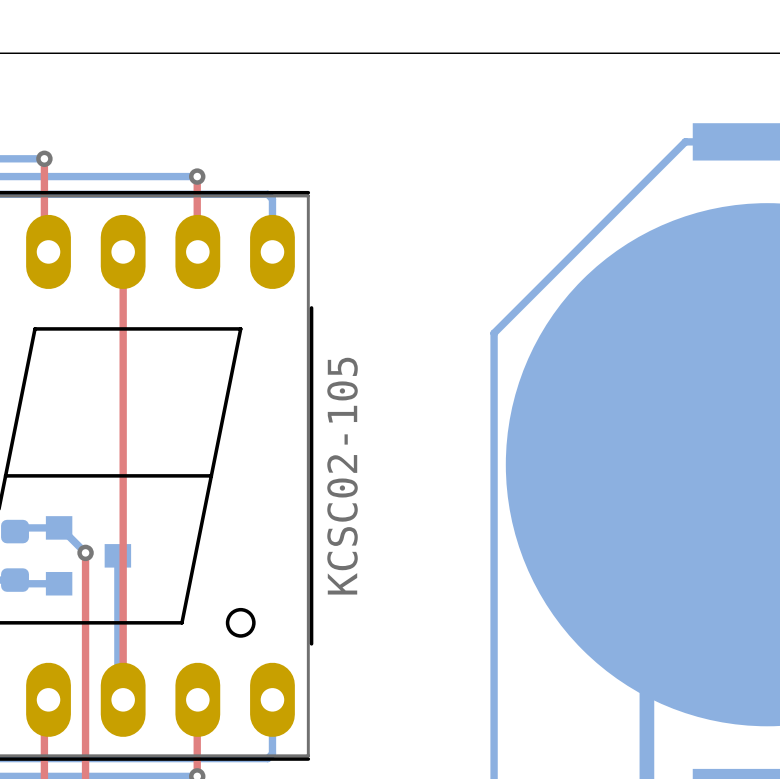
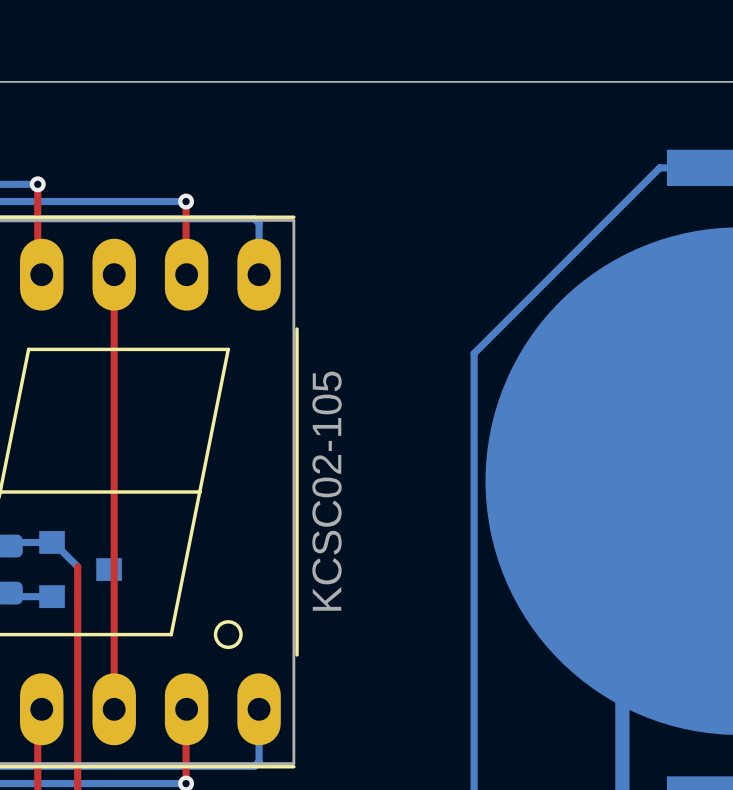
via: (85, 552) -> none
bottom track: (117, 555) (117, 694) (123, 699) -> none

